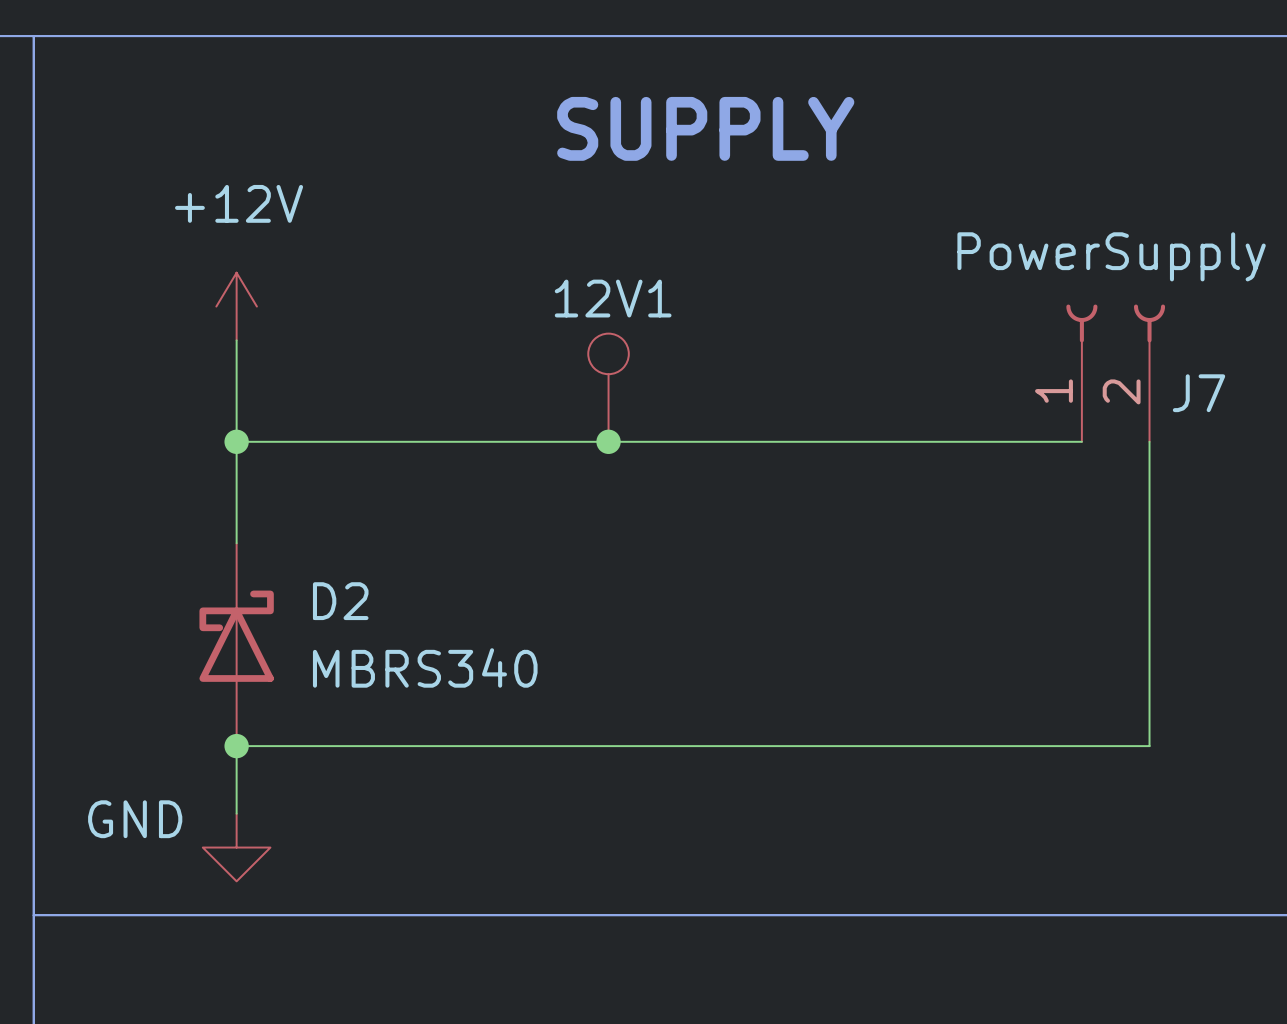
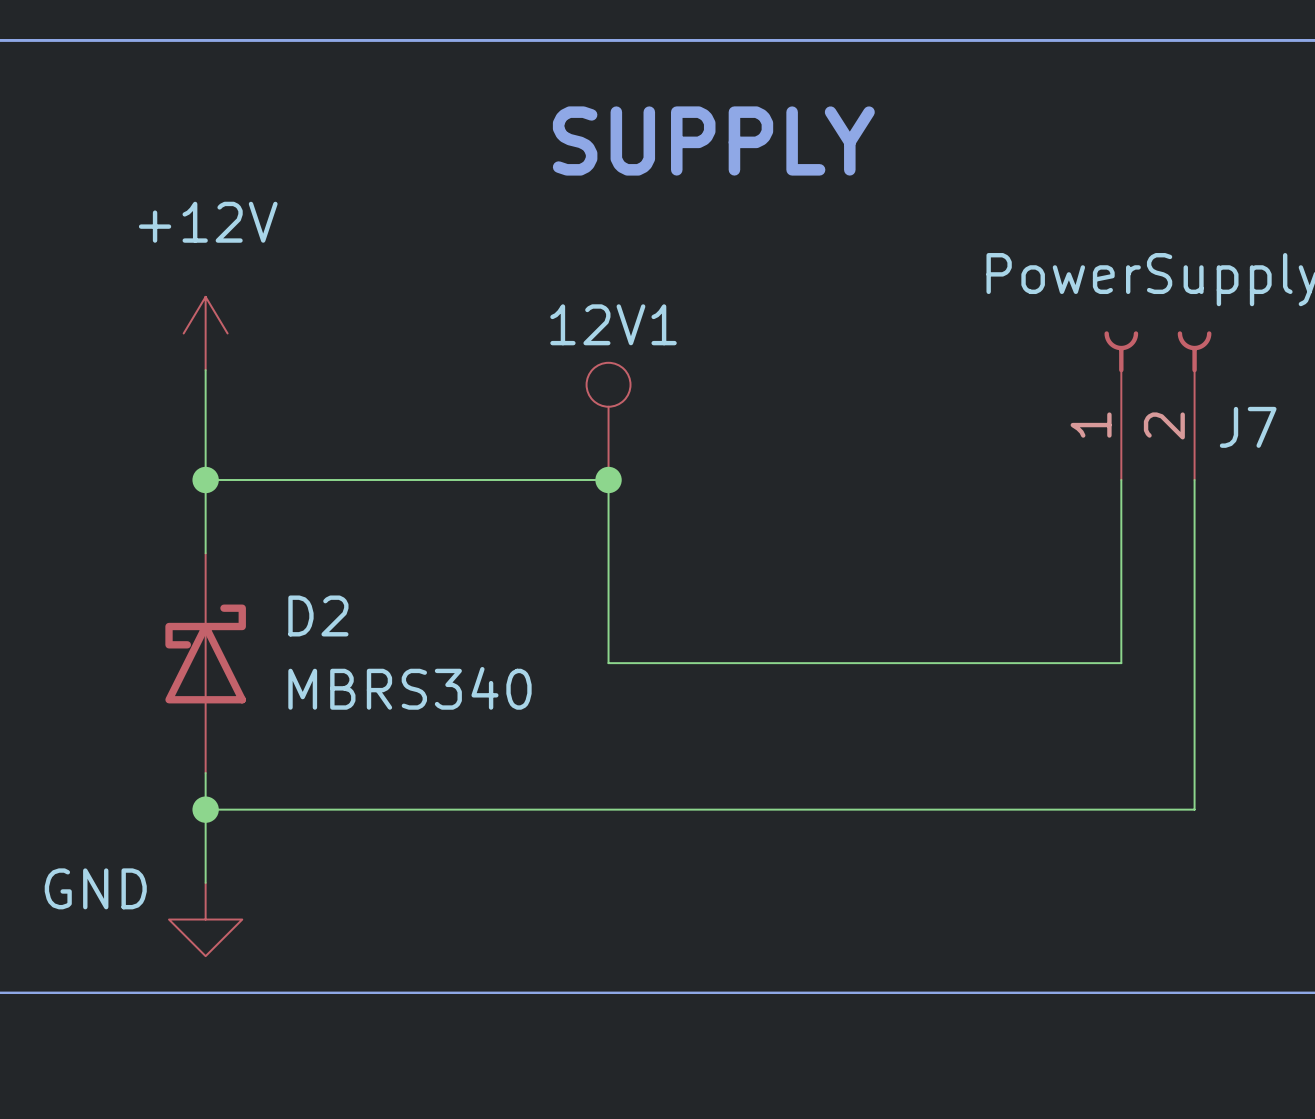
wire: (608, 441) (1081, 441) -> (608, 480) (608, 663) (1121, 663) (1121, 480)
D2 position: (236, 644) -> (205, 663)

